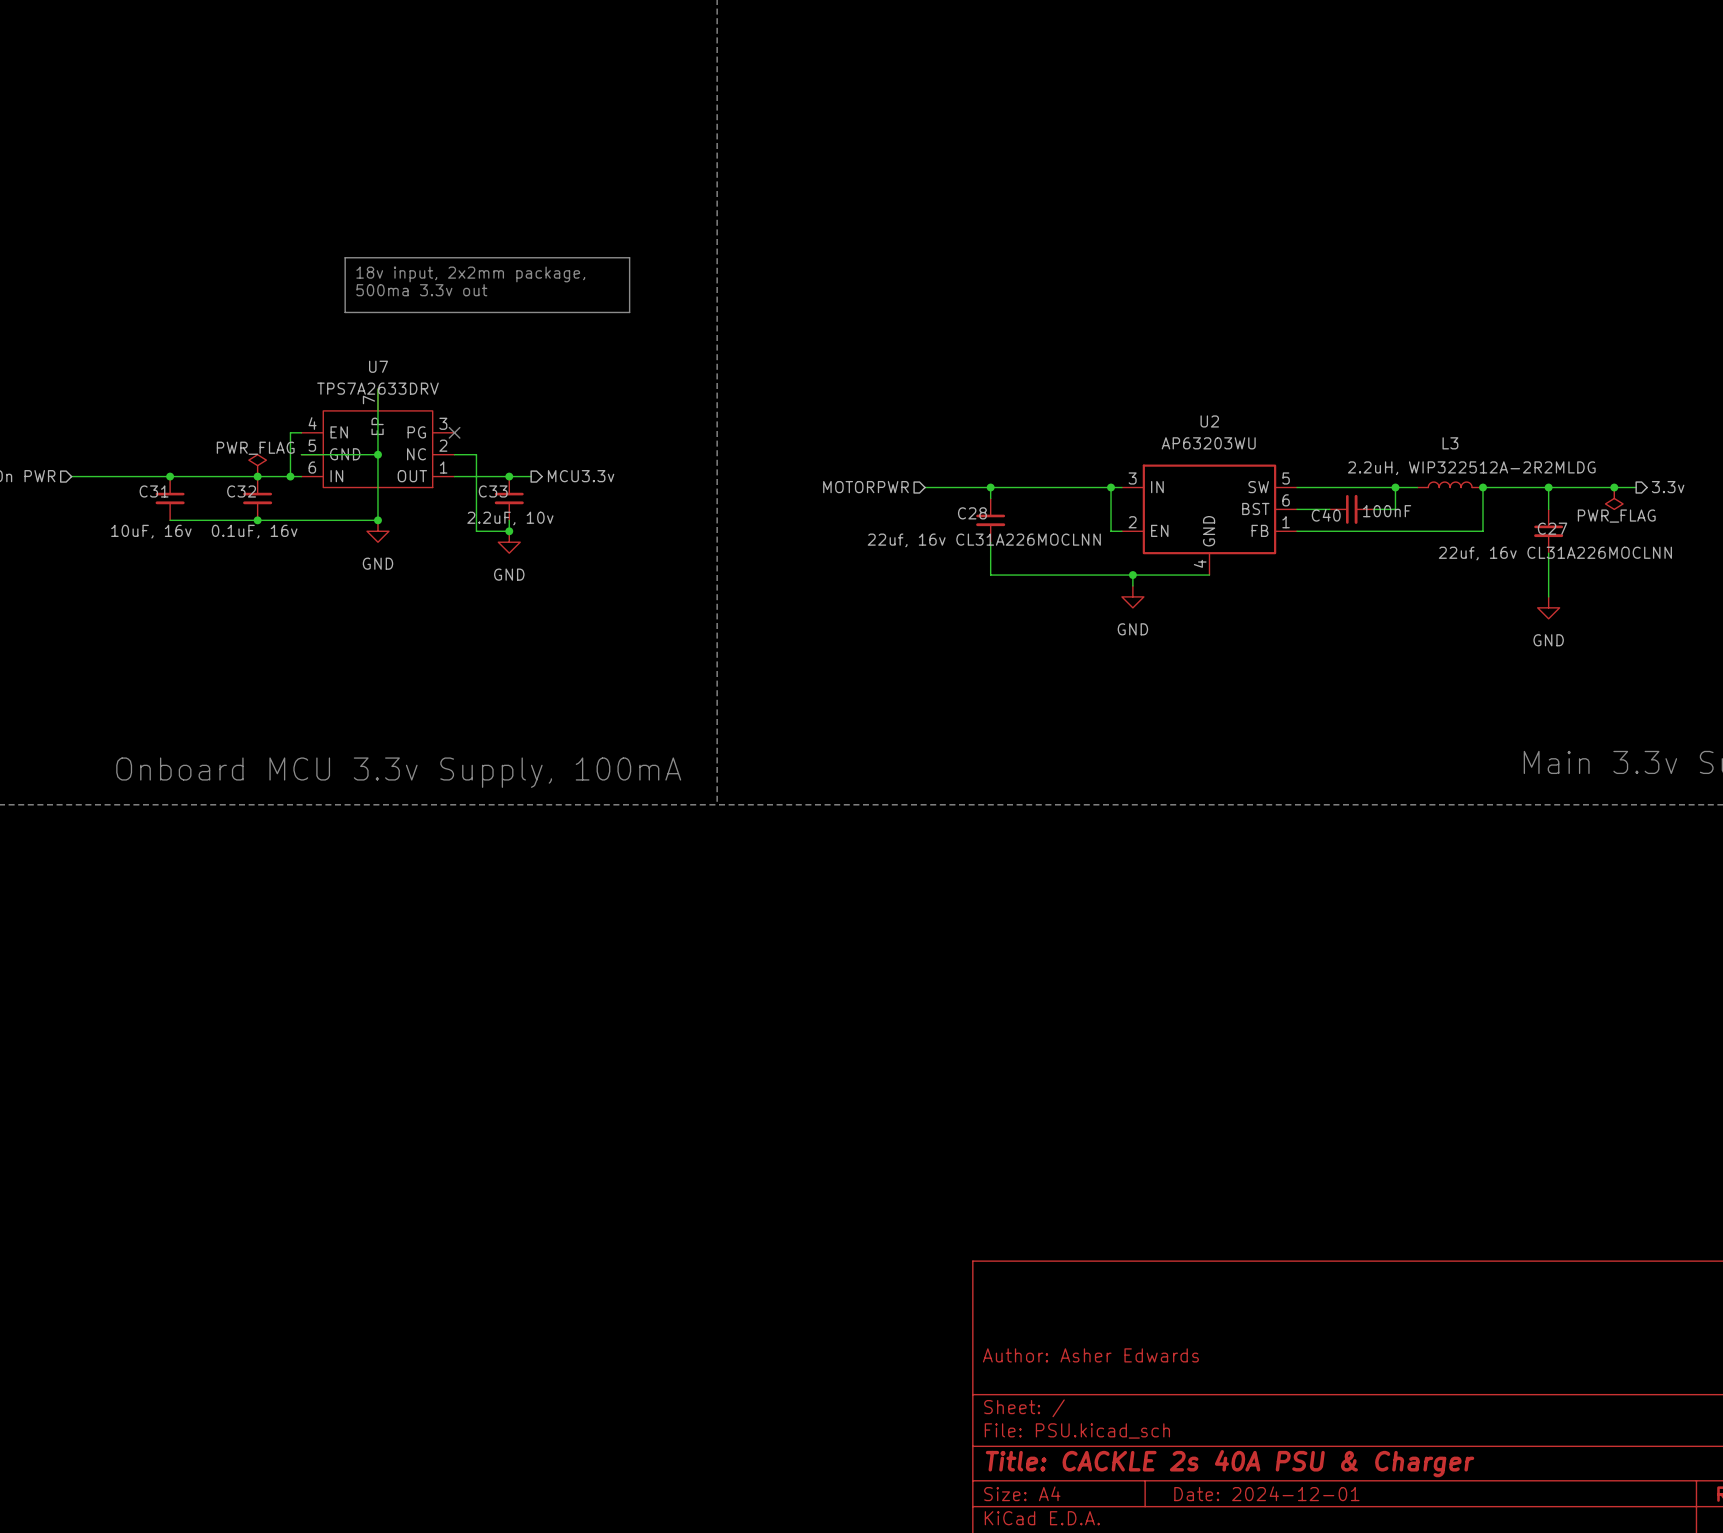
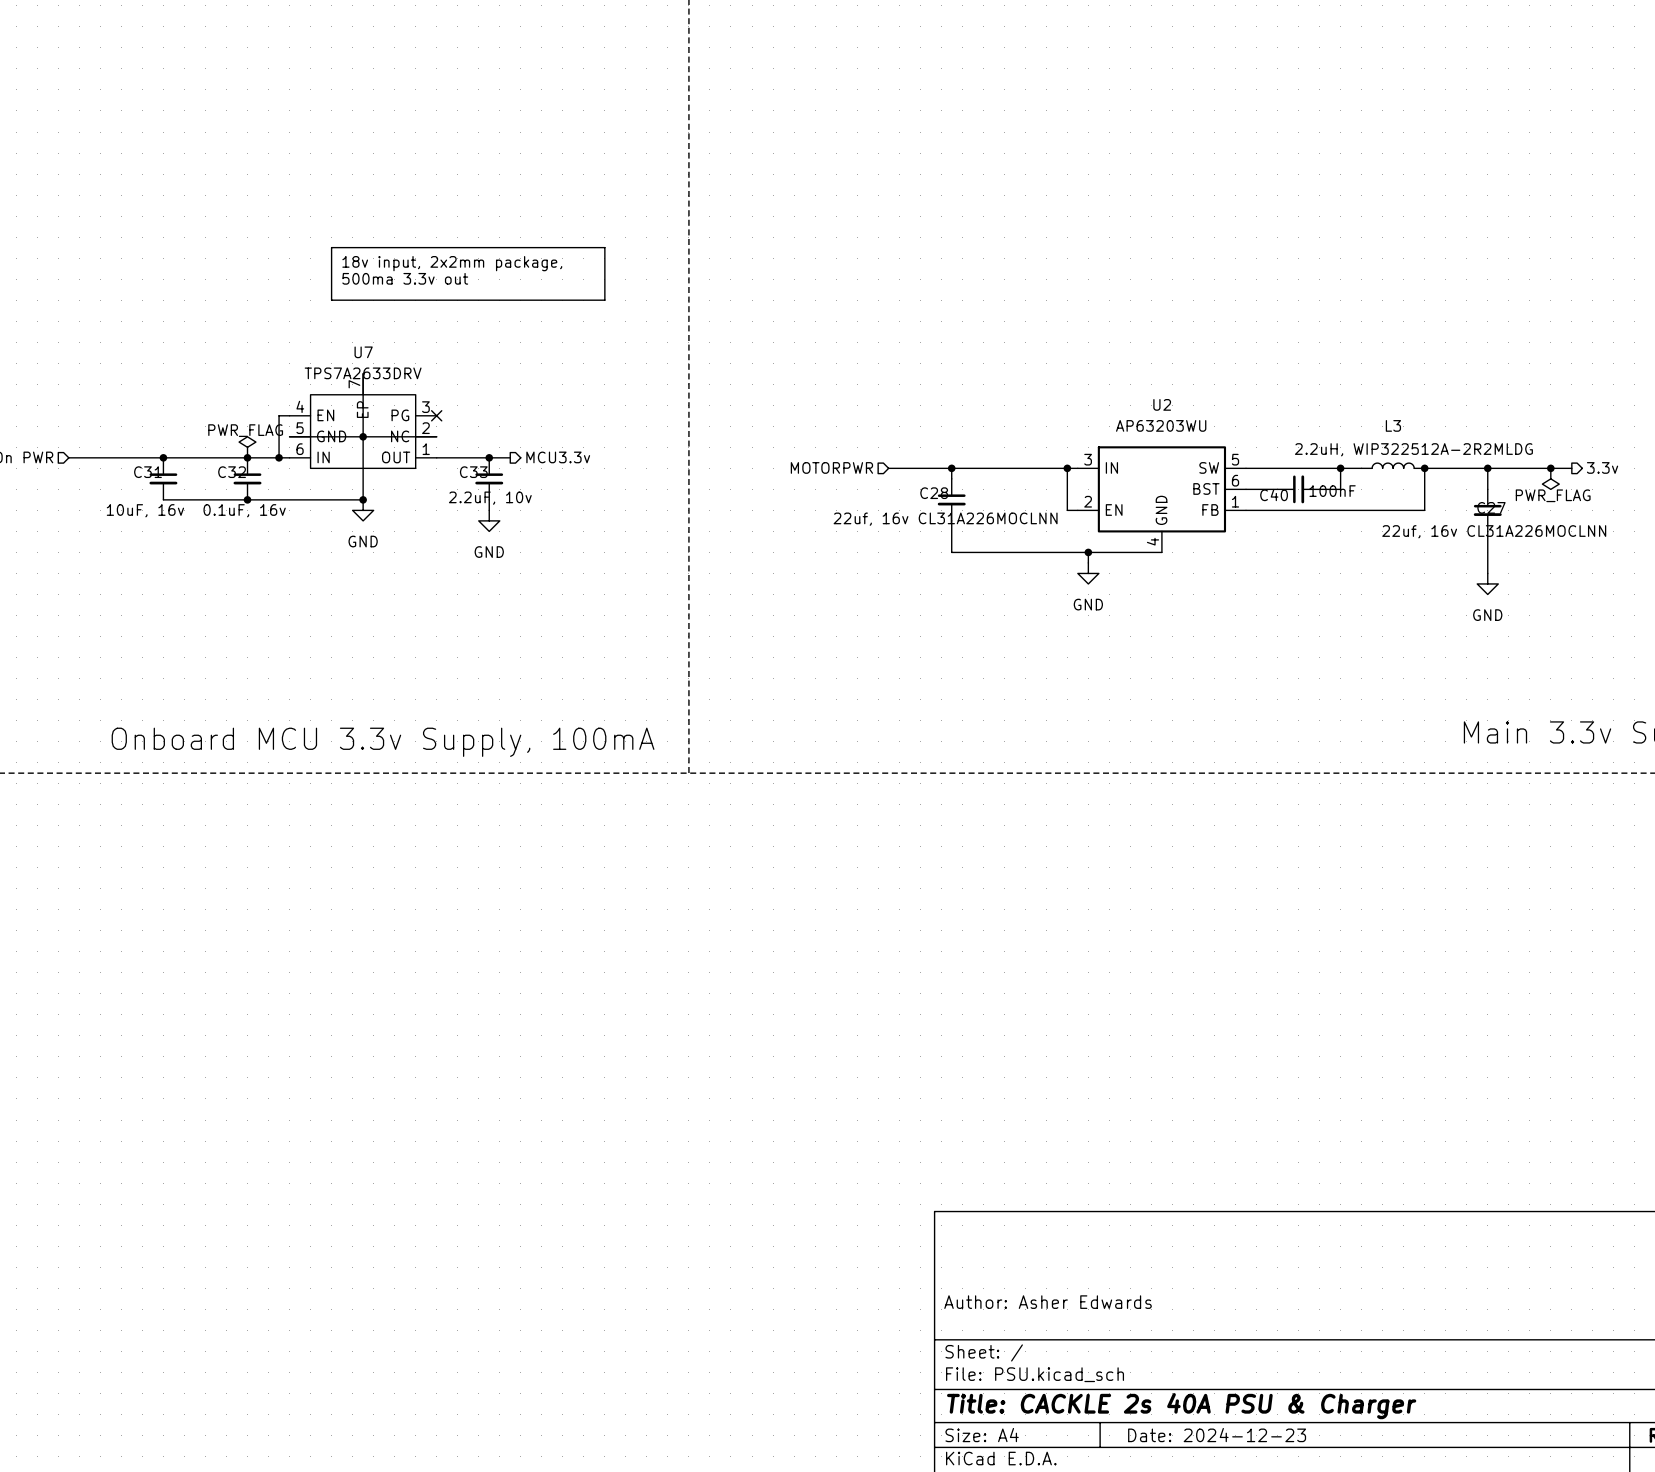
wire: (454, 454) (476, 454) (476, 531) (509, 531) -> (436, 436) (363, 436)
junction: (509, 531) -> none
title block: Date: 2024-12-01 (1266, 1493) -> Date: 2024-12-23 (1217, 1435)

